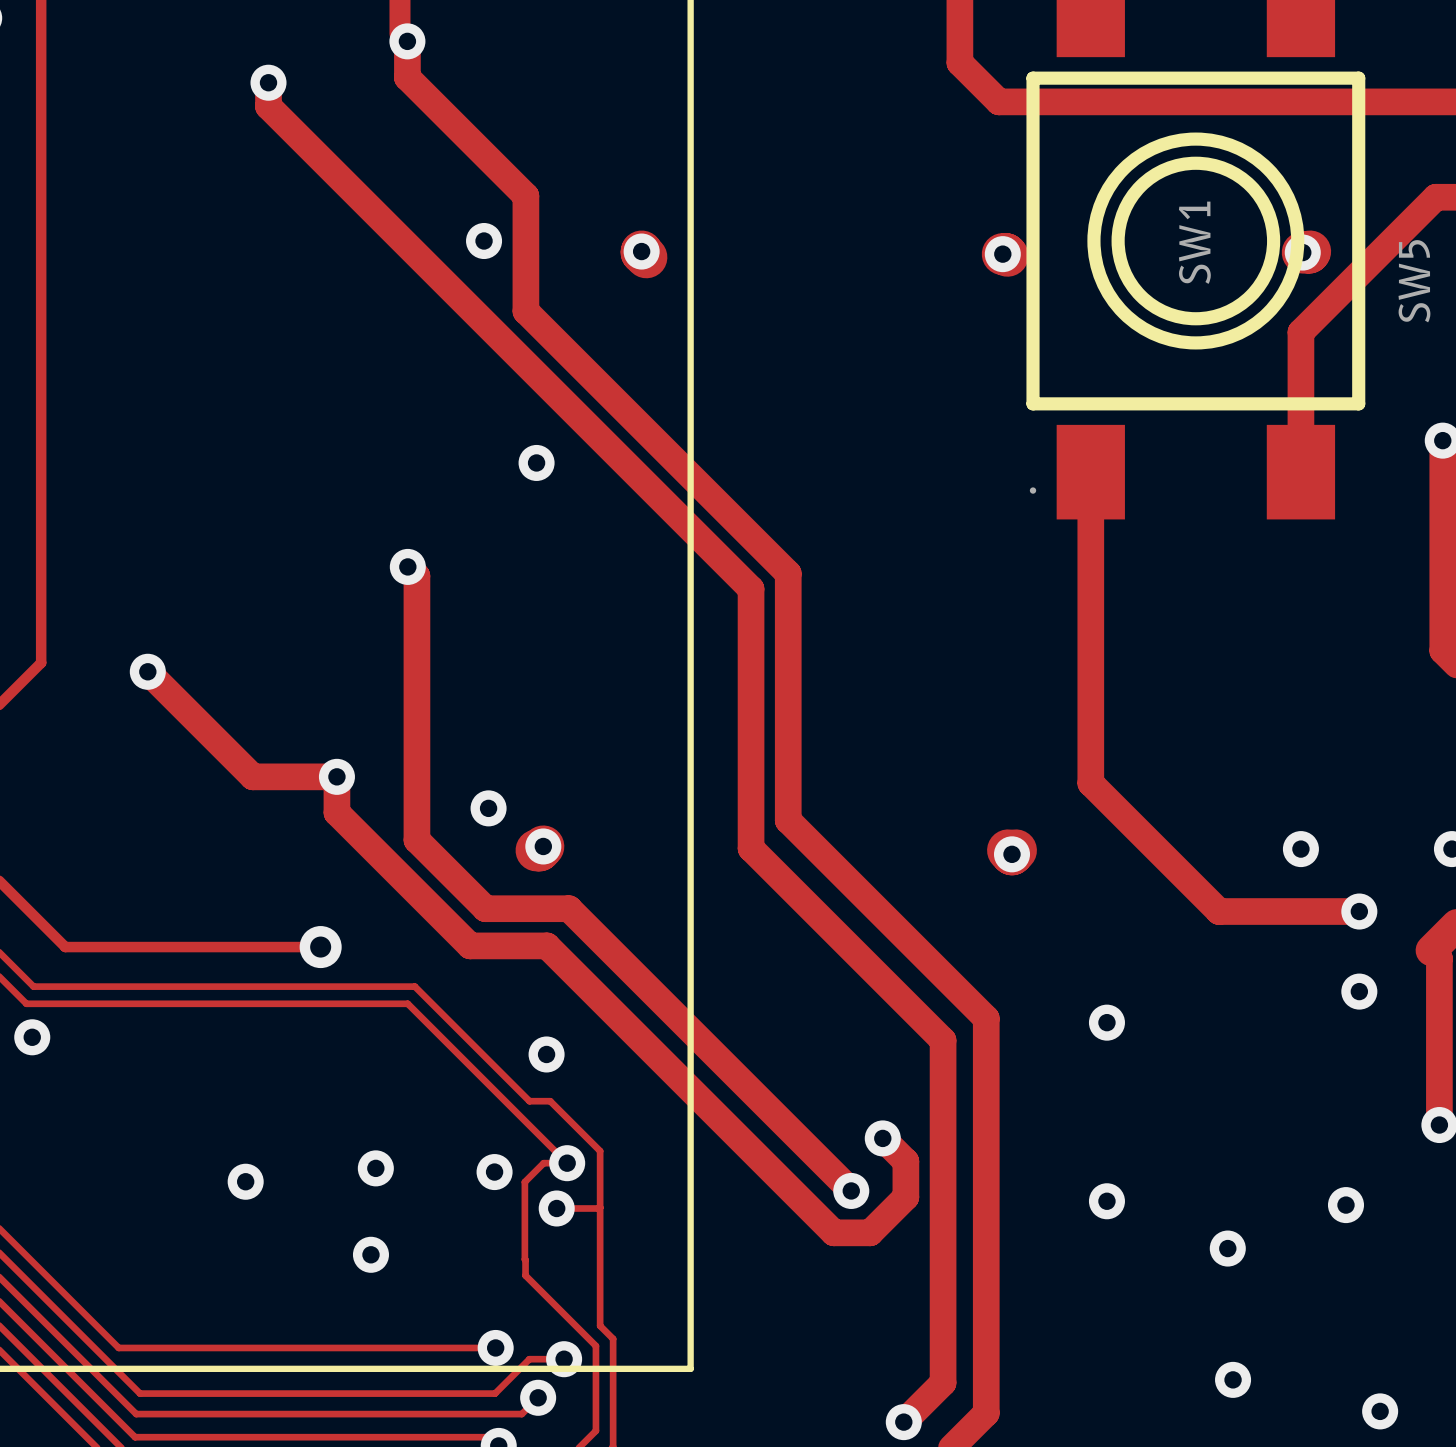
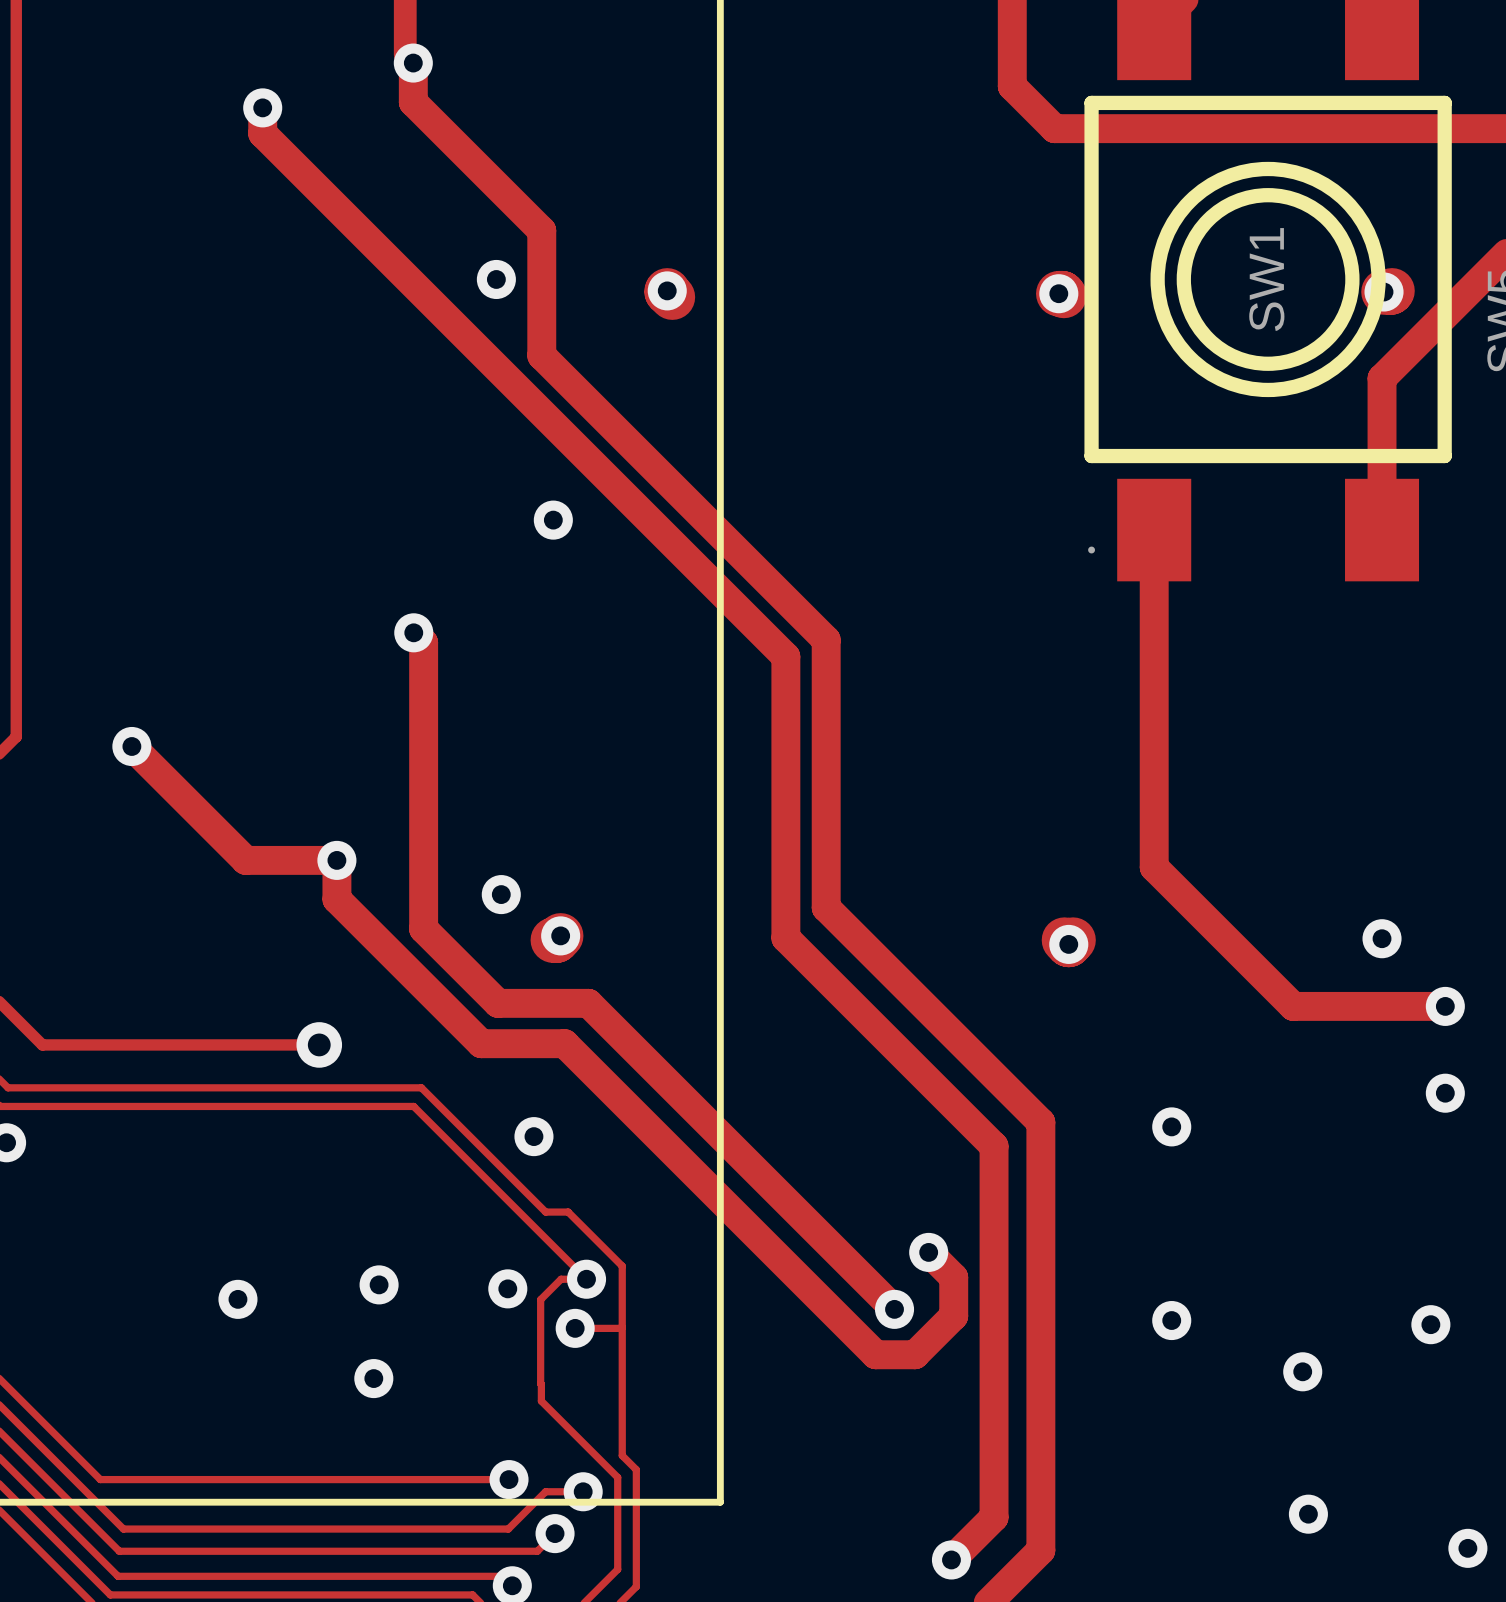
via position: (546, 1054) -> (533, 1136)

